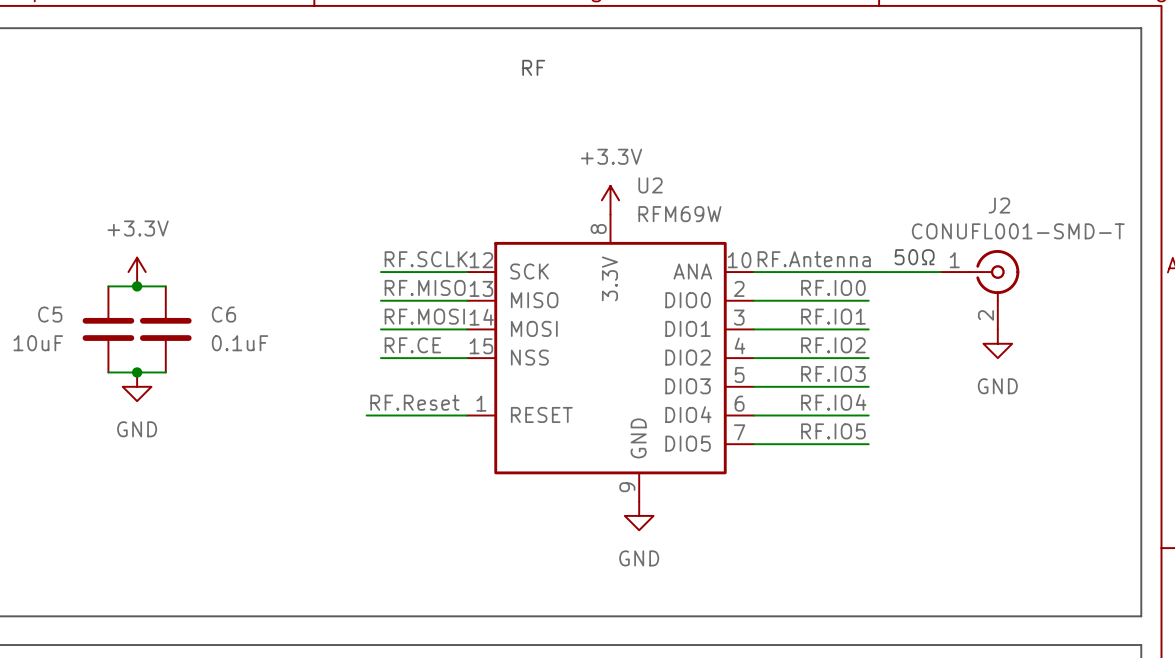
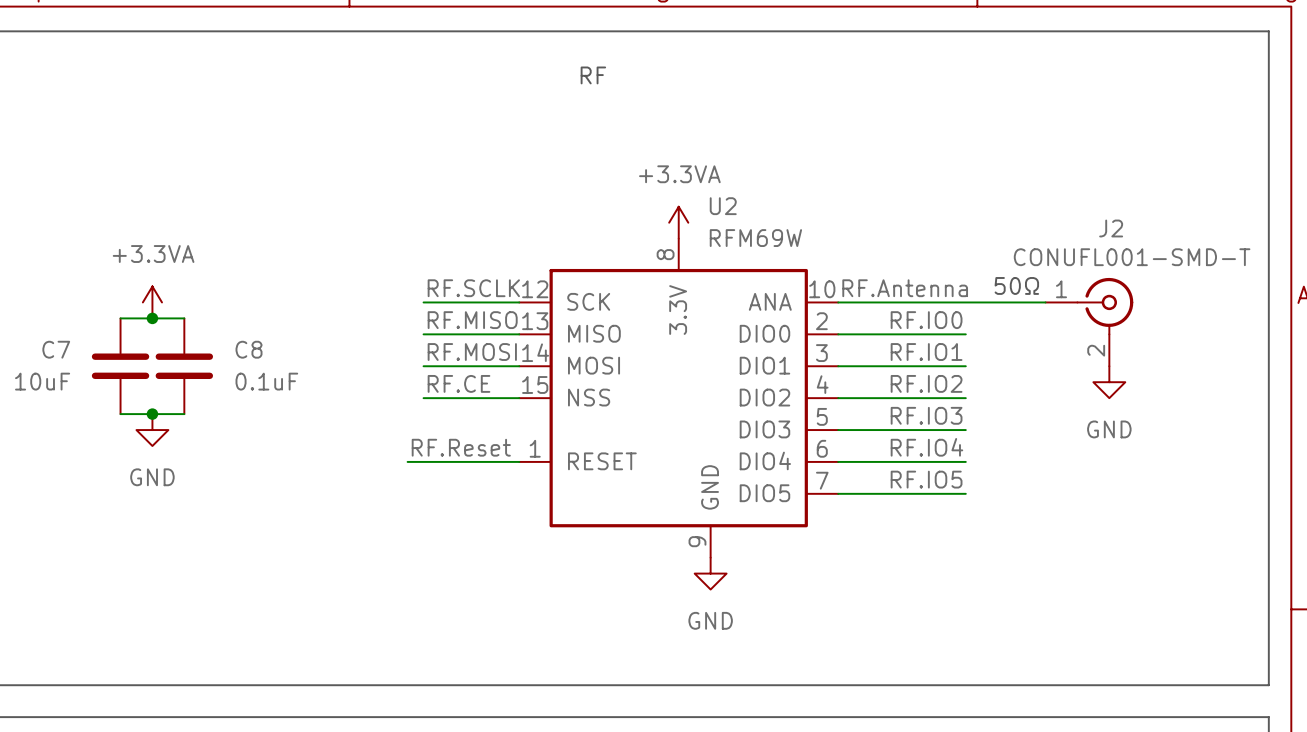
power symbol: +3.3V (610, 200) -> +3.3VA (678, 222)
power symbol: +3.3V (137, 272) -> +3.3VA (152, 302)
C5 name: C5 (50, 314) -> C7 (56, 349)
C6 name: C6 (223, 314) -> C8 (249, 349)

